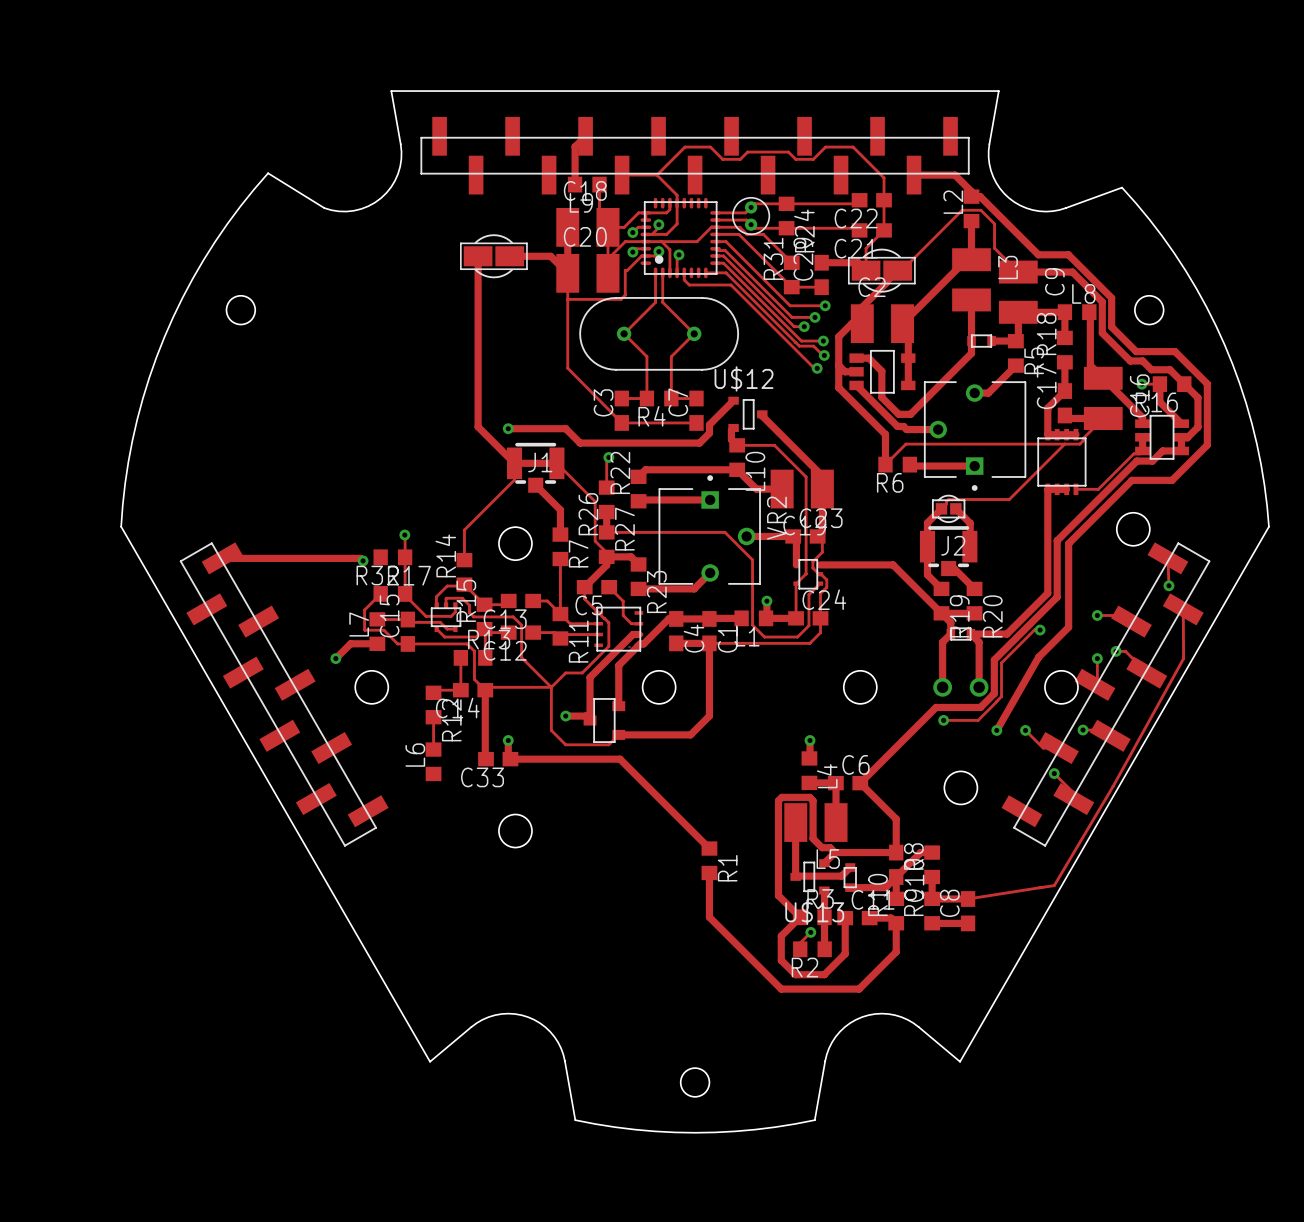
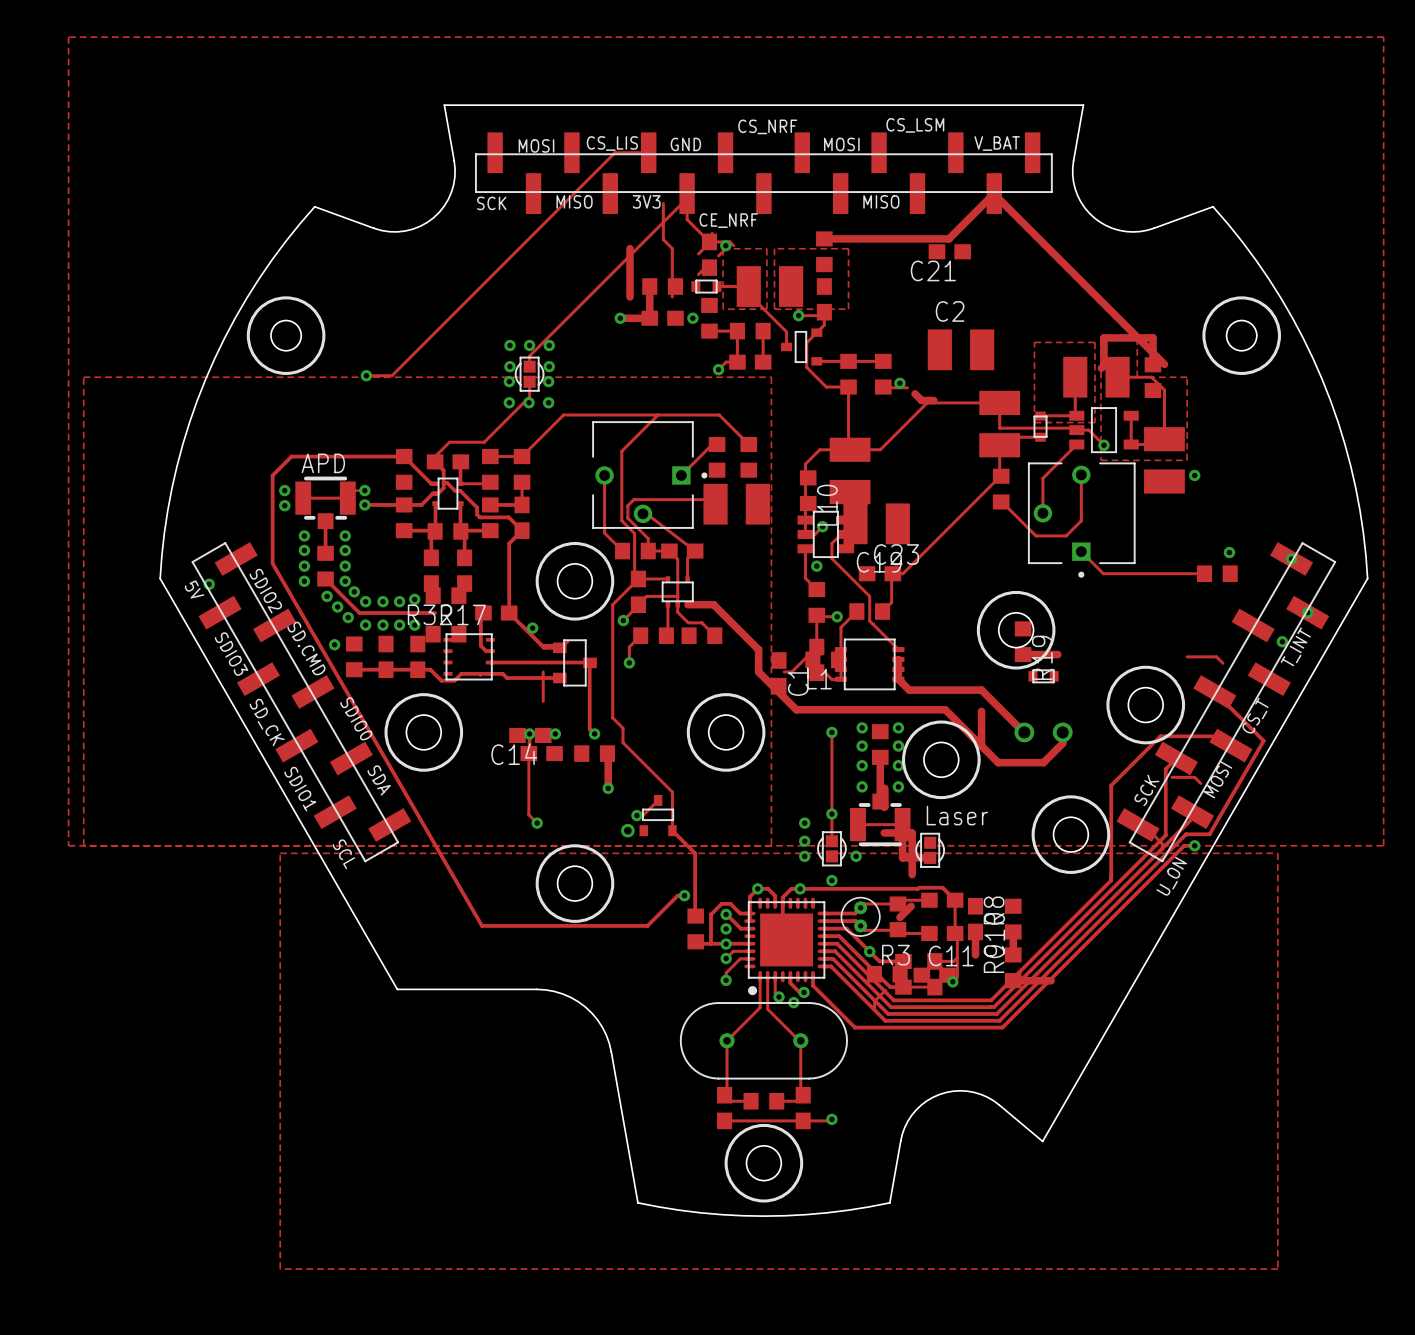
zone outline: none -> (68, 37) (68, 845) (1383, 845) (1383, 37) (68, 37)
text: none -> CS_LSM (915, 125)
text: none -> CS_NRF (767, 126)
text: none -> CS_LIS (612, 143)
text: none -> V_BAT (997, 143)
text: none -> GND (685, 144)
text: none -> MOSI (841, 144)
text: none -> MOSI (536, 145)
track: (585, 136) (575, 146) (575, 184) (576, 182) -> (648, 152) (615, 152) (392, 375) (366, 375)
track: (622, 175) (656, 175) -> (687, 193) (687, 198) (529, 356) (529, 366)
track: (656, 175) (677, 195) (677, 223) (666, 234) (645, 234) -> none
track: (656, 175) (685, 147) (710, 147) (722, 159) (740, 159) (747, 152) (788, 152) (795, 159) (813, 159) (825, 147) (853, 147) (884, 177) (884, 230) (866, 248) (866, 270) (858, 262) (821, 262) -> none
track: (914, 175) (954, 175) (971, 191) (971, 196) (980, 196) (1038, 254) (1068, 254) (1111, 297) (1111, 327) (1136, 351) (1175, 351) (1207, 383) (1207, 445) (1172, 480) (1131, 480) (1068, 543) (1068, 627) (1038, 657) (996, 730) -> none
text: none -> MISO (574, 201)
text: none -> 3V3 (646, 201)
text: none -> MISO (881, 201)
text: none -> SCK (491, 203)
L9: (587, 184) -> none
board edge: (1122, 187) (1149, 219) (1185, 270) (1206, 306) (1224, 344) (1239, 383) (1251, 423) (1261, 464) (1268, 526) (960, 1061) (907, 1019) (888, 1014) (868, 1015) (856, 1019) (844, 1027) (832, 1042) (825, 1061) (814, 1120) (755, 1129) (715, 1132) (654, 1131) (575, 1120) (564, 1061) (558, 1042) (545, 1027) (534, 1019) (521, 1015) (501, 1014) (482, 1019) (430, 1061) (121, 526) (128, 462) (137, 419) (149, 378) (173, 317) (192, 278) (215, 241) (240, 206) (268, 173) (324, 208) -> (1213, 206) (1242, 241) (1268, 278) (1303, 338) (1322, 379) (1338, 422) (1355, 488) (1363, 533) (1367, 578) (1042, 1141) (987, 1097) (967, 1091) (946, 1092) (933, 1097) (921, 1104) (907, 1121) (900, 1140) (889, 1202) (827, 1212) (785, 1215) (721, 1214) (637, 1202) (609, 1043) (597, 1019) (578, 1001) (562, 993) (545, 989) (397, 989) (160, 578) (167, 510) (177, 465) (189, 422) (214, 358) (246, 298) (285, 241) (314, 206) (374, 228)
track: none -> (687, 212) (687, 219) (709, 241) (729, 241) (733, 245)
text: none -> CE_NRF (728, 220)
track: (859, 200) (855, 203) (754, 203) (745, 212) (715, 212) -> none
C22: (871, 200) -> none
track: (669, 203) (669, 209) (666, 212) (638, 212) (624, 227) (607, 227) -> none
L2: (971, 208) -> none
part: (751, 216) -> none
R24: (786, 216) -> none
track: none -> (824, 238) (948, 238) (994, 193) (1164, 364) (1079, 278)
track: (715, 220) (746, 220) (754, 228) (857, 228) (859, 230) -> none
track: (971, 221) (971, 259) (966, 259) (902, 323) (908, 329) (908, 385) -> none
C18: (587, 227) -> none
zone outline: none -> (723, 248) (723, 309) (766, 309) (766, 248) (723, 248)
zone outline: none -> (774, 248) (848, 248) (848, 309) (774, 309) (774, 248)
part: none -> (824, 251)
via: (632, 232) -> none
part: none -> (709, 254)
track: (715, 234) (739, 234) (791, 287) (821, 287) -> none
part: (680, 238) -> none
track: (661, 241) (669, 249) (669, 272) -> none
track: (715, 241) (726, 241) (790, 305) (825, 305) -> none
track: (715, 248) (725, 250) (792, 317) (814, 317) -> none
track: (658, 251) (654, 255) (641, 255) (625, 270) (625, 295) (621, 299) (567, 299) -> none
via: (658, 251) -> none
via: (632, 252) -> none
track: (678, 254) (677, 256) (677, 272) -> none
via: (678, 254) -> none
track: (715, 255) (723, 255) (794, 326) (804, 326) -> none
track: (478, 256) (478, 426) (514, 463) -> none
part: (493, 256) -> none
track: (509, 256) (550, 256) (567, 273) (567, 368) (621, 422) (696, 422) -> none
track: (607, 259) (625, 241) (697, 241) (711, 227) (739, 227) (747, 234) (763, 234) (791, 262) -> none
track: none -> (649, 286) (649, 318) (620, 318)
part: none -> (662, 286)
part: none -> (706, 286)
track: none -> (717, 286) (748, 286) (748, 294) (786, 331) (786, 346)
part: none -> (769, 286)
track: (715, 263) (723, 263) (801, 341) (823, 341) -> none
part: (881, 270) -> none
track: (897, 270) (862, 306) (862, 323) (851, 323) (838, 336) (838, 387) (885, 434) (885, 464) (905, 444) (1079, 444) (1103, 418) (1067, 418) (1064, 415) -> none
track: (896, 271) (901, 271) (962, 210) (980, 210) (994, 223) (994, 248) (1018, 272) (1072, 272) (1102, 301) (1102, 333) (1130, 360) (1142, 360) (1151, 369) (1169, 369) (1197, 397) (1197, 427) (1187, 437) (1181, 437) (1181, 450) (1162, 450) (1152, 461) (1136, 461) (1057, 540) (1057, 597) (994, 659) (994, 693) (980, 707) (936, 707) (860, 783) -> none
drawing: none -> [246, 296, 326, 375]
track: (655, 272) (655, 302) (624, 333) (646, 356) (646, 398) (621, 398) -> none
track: (662, 272) (662, 302) (694, 333) (671, 356) (671, 398) (696, 398) -> none
track: (684, 272) (684, 279) (689, 285) (731, 285) (814, 368) (817, 368) -> none
track: (705, 272) (726, 272) (799, 346) (813, 346) (824, 355) -> none
drawing: none -> [1202, 296, 1281, 375]
C20: (587, 273) -> none
R31: (791, 274) -> none
C29: (821, 274) -> none
part: none -> (824, 299)
L3: (971, 279) -> none
track: none -> (798, 315) (820, 315) (824, 312) (824, 325) (806, 342) (806, 367) (826, 387) (848, 387) (848, 443) (854, 449)
via: none -> (798, 315)
C9: (1018, 292) -> none
via: none -> (620, 318)
part: none -> (662, 318)
via: none -> (692, 318)
part: none -> (709, 318)
track: (971, 299) (971, 353) (910, 414) (898, 414) (881, 397) (881, 371) (868, 358) (856, 358) -> none
track: none -> (709, 331) (737, 331) (737, 362) (726, 362) (718, 369)
part: none -> (750, 331)
track: none -> (763, 331) (763, 362)
via: (825, 305) -> none
L8: (1077, 312) -> none
track: (1089, 312) (1090, 365) (1142, 417) (1142, 423) -> none
zone outline: none -> (1100, 339) (1137, 339) (1137, 377) (1187, 377) (1187, 460) (1100, 460) (1100, 339)
zone outline: none -> (1034, 342) (1034, 422) (1094, 422) (1094, 342) (1034, 342)
via: (814, 317) -> none
via: none -> (509, 345)
via: none -> (529, 345)
via: none -> (549, 345)
part: none -> (801, 346)
via: (804, 326) -> none
part: (659, 333) -> none
track: none -> (816, 361) (883, 361)
R18 name: R18 (1046, 334) -> none
part: none -> (750, 362)
via: none -> (509, 366)
via: none -> (549, 366)
via: (823, 341) -> none
part rotation: 0° (981, 341) -> 90° clockwise (1040, 426)
part position: (981, 341) -> (1040, 426)
track: (991, 341) (1015, 341) -> none
via: none -> (718, 369)
part: none -> (529, 374)
part: none -> (848, 374)
part: none -> (883, 374)
via: none -> (366, 375)
track: none -> (1075, 377) (1076, 415) (1040, 416)
part: none -> (1096, 377)
track: none -> (1117, 377) (1151, 377) (1164, 390) (1164, 439) (1159, 444) (1131, 444) (1131, 415)
via: none -> (509, 381)
track: none -> (529, 381) (529, 396) (484, 442) (449, 442) (435, 456) (435, 461) (443, 470) (443, 488) (438, 493) (432, 493) (421, 504) (364, 504)
via: none -> (548, 381)
R5: (1015, 353) -> none
track: none -> (883, 387) (907, 387)
track: (1064, 362) (1064, 391) (1047, 408) (1047, 434) (1075, 434) -> none
track: (1015, 365) (988, 393) (974, 393) -> none
via: (817, 368) -> none
part position: (882, 371) -> (1103, 430)
via: none -> (509, 402)
via: none -> (529, 402)
via: none -> (548, 402)
track: none -> (999, 402) (999, 428) (1074, 428) (1076, 430) (1088, 430) (1103, 445)
track: none -> (1008, 402) (927, 402) (880, 449) (819, 449) (805, 464) (805, 534) (814, 534) (822, 526)
track: (1141, 384) (1159, 384) (1159, 402) (1181, 423) -> none
via: (1141, 384) -> none
R16: (1172, 384) -> none
track: none -> (658, 415) (621, 451) (621, 520) (634, 533) (634, 575) (638, 579)
track: (856, 385) (897, 426) (903, 426) (906, 429) (938, 429) -> none
part: none -> (999, 424)
R4: (659, 398) -> none
C16: (1103, 398) -> none
track: (733, 400) (709, 424) (709, 433) (699, 443) (580, 443) (565, 428) (508, 428) -> none
C17: (1064, 403) -> none
track: none -> (1043, 437) (1007, 437) (999, 445) (999, 476) (902, 573) (899, 573) (891, 581) (891, 602) (882, 611)
C3: (621, 410) -> none
C7: (696, 410) -> none
track: none -> (717, 444) (712, 444) (681, 475)
track: none -> (748, 444) (719, 415) (563, 415) (522, 456) (490, 456)
track: none -> (1076, 444) (1042, 478) (1042, 513)
U$12: (747, 414) -> none
track: (762, 414) (822, 476) (822, 531) (817, 536) -> none
via: none -> (1103, 445)
part: none -> (717, 457)
part: none -> (748, 457)
track: (733, 427) (731, 430) (731, 439) (737, 445) (774, 445) (806, 476) (806, 573) (796, 583) (796, 618) (766, 618) (766, 601) -> none
via: (508, 428) -> none
part: none -> (1164, 460)
part: none -> (447, 461)
track: none -> (460, 461) (460, 483) (490, 482)
text: none -> APD (323, 463)
part position: (975, 436) -> (1081, 520)
part: none -> (404, 469)
part: none -> (490, 469)
part: none -> (522, 469)
track: (1142, 437) (1142, 450) (1139, 453) (1133, 453) (1098, 489) (1075, 489) -> none
part: (1162, 437) -> none
part: none -> (850, 470)
part: none -> (649, 475)
track: none -> (1081, 474) (1081, 520) (1066, 535) (1035, 535) (1001, 501)
track: none -> (604, 475) (604, 533) (622, 551)
via: none -> (1194, 475)
track: (1064, 444) (1009, 499) (948, 499) (927, 522) (927, 574) (941, 588) -> none
track: none -> (522, 482) (522, 504) (490, 504)
track: none -> (435, 483) (431, 483) (404, 456) (291, 456) (272, 475) (272, 563) (482, 925) (647, 925) (677, 895) (684, 895)
track: none -> (443, 483) (447, 483) (455, 490) (460, 490) (477, 507) (477, 514) (479, 517) (508, 517) (522, 530) (509, 543) (509, 613) (543, 647) (559, 647)
part: none -> (1001, 489)
via: none -> (284, 490)
track: none -> (364, 490) (355, 490) (347, 498) (303, 498)
via: none -> (364, 490)
track: (608, 457) (606, 459) (606, 487) -> none
via: (608, 457) -> none
part: none -> (447, 493)
part rotation: 0° (1061, 462) -> 90° clockwise (869, 664)
part position: (1061, 462) -> (869, 664)
track: (514, 463) (556, 463) (595, 501) (595, 541) (606, 552) (606, 556) -> none
track: (514, 463) (514, 479) (464, 530) (464, 560) -> none
R6: (897, 464) -> none
track: (909, 464) (974, 466) -> none
J1: (535, 467) -> none
part: none -> (325, 502)
track: none -> (435, 503) (435, 531) (431, 535) (431, 557)
track: none -> (460, 503) (460, 531) (464, 535) (464, 557)
track: none -> (715, 504) (710, 499) (633, 499) (627, 505) (627, 518) (648, 538) (648, 551) (669, 551) (677, 559) (677, 612) (688, 622) (701, 622) (714, 635)
part: none -> (736, 504)
via: none -> (284, 505)
via: none -> (364, 504)
track: (638, 476) (645, 469) (737, 469) (756, 489) (782, 489) -> none
track: none -> (642, 513) (646, 513) (695, 551) (687, 558) (687, 579)
part: none -> (404, 517)
part: none -> (490, 517)
part: none -> (522, 517)
track: (535, 485) (560, 509) (560, 534) -> none
track: none -> (846, 520) (846, 534) (840, 534) (831, 543) (831, 558) (869, 596) (869, 620) (898, 649)
track: none -> (325, 521) (325, 553)
R22: (638, 489) -> none
track: (1066, 489) (1047, 489) (1047, 593) (1007, 634) (970, 634) (979, 642) (979, 687) -> (687, 604) (713, 604) (758, 649) (758, 671) (796, 709) (945, 709) (998, 762) (1043, 762) (1062, 743) (1062, 732)
via: none -> (822, 526)
track: none -> (404, 530) (435, 531)
track: none -> (490, 530) (460, 531)
part: none -> (447, 531)
R27: (606, 499) -> none
track: (710, 499) (638, 501) -> none
part: none -> (825, 534)
via: none -> (304, 535)
via: none -> (345, 535)
drawing: none -> [535, 541, 615, 621]
part: (948, 508) -> none
track: (955, 508) (970, 523) (969, 546) -> none
track: (606, 512) (606, 532) (725, 532) (752, 559) (752, 625) (764, 637) -> (816, 672) (825, 672) (831, 679) (836, 679)
track: none -> (805, 548) (805, 578) (816, 589)
round board edge: [1116, 512, 1150, 546] -> none
via: none -> (304, 550)
via: none -> (345, 550)
part: none -> (635, 551)
part: none -> (682, 551)
track: none -> (1081, 551) (1103, 573) (1204, 573)
via: none -> (1229, 552)
via: none -> (1291, 559)
via: none -> (304, 566)
part: none -> (325, 566)
via: none -> (345, 566)
VR2: (709, 529) -> none
via: none -> (816, 566)
track: (822, 529) (822, 552) (812, 561) (812, 568) (826, 579) (826, 587) (820, 593) (820, 632) (809, 643) (709, 643) -> none
part: none -> (431, 570)
part: none -> (464, 570)
track: (404, 535) (405, 595) (426, 616) (451, 616) (455, 612) (455, 605) -> none
via: (404, 535) -> none
track: (746, 536) (793, 536) (796, 539) (796, 564) -> none
part: none -> (1217, 573)
track: none -> (325, 579) (359, 613) (435, 613)
track: none -> (638, 579) (667, 579)
track: none -> (638, 579) (612, 604) (612, 717) (622, 728) (622, 742) (672, 792) (672, 830) (695, 853) (695, 916)
via: none -> (304, 581)
via: none -> (345, 581)
R26: (606, 544) -> none
via: none -> (209, 584)
R7: (560, 546) -> none
text: none -> 5V (194, 589)
J2: (948, 551) -> none
drawing: none -> [976, 590, 1056, 670]
text: none -> SDIO2 (265, 591)
via: none -> (354, 591)
part: none -> (638, 591)
part: none -> (677, 591)
track: (606, 556) (606, 565) (584, 587) (584, 599) (608, 622) (608, 646) (582, 672) (565, 672) (551, 687) -> none
track: (606, 556) (630, 556) (638, 564) -> none
track: (222, 558) (360, 558) (363, 560) -> none
via: none -> (327, 596)
track: none -> (677, 596) (646, 596) (623, 620)
part footprint: [793, 558, 824, 590] -> [849, 603, 891, 620]
track: (1167, 558) (1168, 585) -> none
track: (560, 559) (560, 614) -> none
via: none -> (365, 601)
via: none -> (382, 601)
via: none -> (399, 601)
part: none -> (816, 602)
track: (820, 564) (893, 564) (950, 622) (950, 634) (942, 642) (942, 687) -> (898, 659) (898, 679) (909, 690) (981, 690) (1024, 732)
track: none -> (667, 604) (666, 635) (666, 630)
via: none -> (337, 606)
track: (948, 568) (954, 568) (974, 588) -> none
R14: (464, 572) -> none
track: (710, 572) (694, 588) (638, 588) -> none
track: none -> (483, 613) (480, 615) (480, 645) (486, 651) (490, 651)
part: none -> (496, 613)
round board edge: none -> [998, 612, 1034, 648]
via: none -> (1307, 612)
R23: (638, 576) -> none
track: none -> (837, 616) (816, 615) (816, 647) (791, 671) (784, 671)
via: none -> (348, 617)
via: none -> (623, 620)
track: (820, 583) (808, 594) (808, 625) (797, 637) (768, 637) -> (856, 611) (840, 627) (840, 679)
via: none -> (365, 625)
via: none -> (382, 625)
via: none -> (399, 625)
via: none -> (414, 625)
via: (1168, 585) -> none
track: (465, 586) (447, 586) (436, 596) (436, 605) -> none
C5: (596, 587) -> none
track: (609, 587) (623, 601) (623, 615) (631, 623) (638, 623) -> none
via: none -> (532, 628)
track: (380, 593) (364, 610) (364, 630) (383, 630) (397, 643) (467, 643) (474, 651) (474, 679) (485, 690) -> none
track: none -> (640, 635) (629, 647) (629, 662)
part: none -> (653, 635)
part: none -> (701, 635)
C13: (520, 600) -> none
track: (533, 600) (547, 600) (570, 623) (598, 623) -> none
via position: (766, 601) -> (837, 616)
R20: (974, 601) -> none
via: none -> (1282, 641)
via: none -> (334, 644)
track: (446, 605) (446, 598) (462, 598) (469, 605) (469, 612) (473, 616) (513, 616) (521, 625) (521, 657) (551, 687) -> none
text: none -> T_INT (1295, 646)
text: none -> SD.СMD (306, 648)
track: (1183, 609) (1183, 658) (1113, 786) (1054, 885) (1039, 887) -> none
text: none -> SDIO3 (231, 654)
part: none -> (354, 656)
part: none -> (386, 656)
part: none -> (417, 656)
via: (1097, 615) -> none
R15: (484, 616) -> none
part: (446, 617) -> none
track: (741, 618) (668, 618) (618, 665) (618, 706) -> none
part: none -> (816, 659)
C24: (808, 618) -> none
track: (377, 619) (440, 622) (447, 629) (455, 629) -> none
track: none -> (490, 662) (589, 662)
track: none -> (589, 662) (589, 729) (594, 733)
via: none -> (629, 662)
drawing: none -> [1106, 665, 1186, 745]
R11: (560, 626) -> none
track: none -> (354, 669) (430, 669) (441, 680) (454, 680) (461, 673) (502, 673) (506, 678) (559, 678)
track: (436, 629) (444, 637) (476, 637) (484, 629) (488, 632) (508, 632) -> none
part position: (618, 629) -> (469, 656)
track: (1039, 629) (1034, 629) (1001, 662) (1001, 696) (978, 720) (943, 720) -> none
via: (1040, 630) -> none
L7: (377, 631) -> none
C15: (407, 631) -> none
C4: (676, 631) -> none
C12: (520, 632) -> none
track: (533, 632) (554, 632) (560, 638) (564, 634) (598, 634) -> none
track: (638, 634) (632, 634) (590, 677) (590, 720) (585, 716) (565, 716) -> none
track: (377, 643) (350, 643) (335, 658) -> none
track: (676, 643) (709, 643) -> none
track: (709, 643) (709, 716) (690, 734) (618, 734) (608, 744) (565, 744) (551, 730) (551, 687) -> none
track: none -> (1214, 692) (1263, 740) (1209, 834) (1186, 834) (999, 1020) (885, 1020) (831, 966) (823, 966)
drawing: none -> [384, 693, 464, 772]
drawing: none -> [686, 693, 766, 772]
via: (1116, 651) -> none
track: (460, 657) (460, 690) (436, 690) (433, 692) -> none
R13: (473, 657) -> none
via: (335, 658) -> none
track: (1097, 658) (1097, 682) (1094, 684) -> none
via: (1097, 658) -> none
track: none -> (981, 711) (981, 746)
text: none -> CS_T (1255, 715)
text: none -> SDIO0 (356, 718)
drawing: none -> [902, 720, 981, 800]
text: none -> SD_CK (267, 722)
via: none -> (862, 727)
via: none -> (898, 727)
track: (551, 687) (488, 687) (485, 690) -> none
track: none -> (831, 732) (831, 841) (835, 842)
via: none -> (831, 732)
round board edge position: (860, 687) -> (941, 759)
round board edge position: (1061, 687) -> (1145, 705)
track: none -> (529, 733) (528, 814) (537, 823)
via: none -> (529, 733)
via: none -> (555, 733)
via: none -> (594, 733)
track: (485, 690) (486, 759) -> none
part position: (284, 694) -> (301, 702)
part position: (1105, 694) -> (1226, 702)
part: none -> (880, 744)
track: none -> (1230, 745) (1221, 736) (1160, 736) (1111, 785) (1111, 880) (991, 1000) (893, 1000) (837, 943) (823, 943)
via: none -> (862, 746)
via: none -> (898, 746)
R12: (433, 705) -> none
part: none -> (541, 753)
part: none -> (594, 753)
track: none -> (607, 753) (608, 788)
track: none -> (880, 757) (880, 801)
track: none -> (1176, 758) (1165, 769) (1165, 835) (994, 1007) (890, 1007) (835, 951) (823, 951)
via: (565, 716) -> none
track: (433, 717) (433, 749) -> none
via: none -> (862, 765)
via: none -> (898, 765)
part rotation: 0° (604, 720) -> 180° (574, 662)
part position: (604, 720) -> (574, 662)
via: (943, 720) -> none
via: (996, 730) -> none
track: (1025, 730) (1043, 748) (1058, 748) -> none
via: (1025, 730) -> none
via: (1083, 730) -> none
text: none -> SDA (379, 780)
text: none -> MOSI (1217, 779)
via: none -> (862, 786)
via: none -> (898, 786)
track: (508, 740) (508, 757) (510, 759) (620, 759) (709, 848) -> none
via: (508, 740) -> none
via: none -> (608, 788)
via: (810, 740) -> none
text: none -> SDIO1 (300, 789)
text: none -> SCK (1146, 790)
drawing: none -> [1031, 795, 1111, 874]
track: none -> (658, 800) (642, 815) (636, 815)
C33: (498, 759) -> none
L6: (433, 761) -> none
track: none -> (1192, 812) (1192, 818) (996, 1013) (888, 1013) (833, 958) (823, 958)
via: none -> (831, 814)
via: none -> (636, 815)
part: none -> (658, 815)
text: none -> Laser (957, 815)
part: none -> (880, 819)
L4: (809, 770) -> none
via: none -> (537, 823)
via: none -> (804, 823)
via: (1054, 773) -> none
track: none -> (857, 824) (902, 824) (902, 857) (930, 857)
via: none -> (627, 830)
C6: (848, 783) -> none
track: (860, 783) (896, 819) (896, 852) (835, 852) (830, 847) (822, 847) (813, 838) (813, 800) (809, 797) (781, 797) (778, 800) (778, 895) (800, 917) (781, 936) (781, 960) (795, 974) (824, 974) (845, 953) (845, 918) -> none
round board edge position: (960, 787) -> (1070, 834)
via: none -> (804, 841)
drawing: none -> [535, 844, 615, 923]
zone outline: none -> (83, 845) (83, 377) (771, 377) (771, 845)
track: none -> (1194, 845) (1184, 845) (1002, 1027) (854, 1027) (813, 985) (813, 976)
via: none -> (1194, 845)
part: none -> (831, 848)
part: none -> (930, 850)
zone outline: none -> (280, 853) (1277, 853) (1277, 1269) (280, 1269) (280, 853)
text: none -> SCL (343, 854)
via: none -> (804, 856)
via: none -> (856, 856)
track: (795, 822) (795, 876) -> none
L5: (815, 822) -> none
text: none -> U_ON (1171, 876)
via: none -> (831, 880)
via: none -> (757, 888)
via: none -> (800, 888)
via: none -> (684, 895)
track: none -> (929, 900) (901, 900) (897, 903) (864, 903) (854, 913) (823, 913)
part: none -> (942, 900)
track: none -> (955, 900) (957, 977) (952, 981)
track: none -> (955, 900) (942, 887) (791, 888) (782, 897) (782, 936)
track: none -> (775, 903) (775, 895) (768, 888) (757, 888) (749, 896) (749, 921)
track: (932, 852) (920, 852) (885, 887) (850, 887) -> none
track: none -> (749, 913) (740, 913) (730, 903) (721, 903) (710, 914) (710, 943)
track: none -> (726, 914) (740, 928) (749, 928)
via: none -> (726, 914)
R1: (709, 860) -> none
part: none -> (860, 916)
part: none -> (897, 916)
track: none -> (823, 921) (855, 921) (865, 930) (898, 930)
track: (850, 867) (841, 876) (795, 876) -> none
track: (709, 872) (709, 917) (781, 989) (859, 989) (896, 952) (896, 923) (891, 918) (869, 918) -> none
track: none -> (823, 928) (846, 928) (879, 961) (903, 961)
part: none -> (695, 928)
via: none -> (726, 928)
track: none -> (897, 929) (901, 933) (929, 933)
U$13: (810, 876) -> none
part: (850, 877) -> none
part: none -> (942, 933)
track: none -> (823, 936) (839, 936) (890, 987) (934, 987)
track: (1042, 887) (968, 898) (932, 898) -> none
track: none -> (697, 944) (695, 941) (697, 943) (749, 943) (749, 944)
via: none -> (726, 944)
part: none -> (786, 946)
track: (824, 890) (824, 949) -> none
track: none -> (749, 951) (733, 951) (726, 958)
via: none -> (869, 951)
track: none -> (957, 957) (953, 961) (934, 961)
via: none -> (726, 958)
track: none -> (749, 959) (740, 958) (726, 973) (726, 980)
R10: (896, 911) -> none
C8: (968, 911) -> none
part: none -> (903, 974)
part: none -> (934, 974)
track: none -> (760, 976) (760, 1007) (727, 1040) (727, 1092) (724, 1095) (730, 1101) (751, 1101)
track: none -> (767, 976) (767, 1009) (800, 1042)
track: none -> (775, 976) (775, 993) (779, 996)
track: none -> (790, 976) (790, 983) (799, 992) (804, 992)
via: none -> (726, 980)
via: none -> (952, 981)
via: (810, 932) -> none
via: none -> (804, 992)
via: none -> (779, 996)
via: none -> (793, 1002)
R2: (812, 949) -> none
part: none -> (763, 1040)
track: none -> (800, 1040) (800, 1092) (803, 1095) (797, 1101) (776, 1101)
part: none -> (763, 1101)
part: none -> (724, 1108)
part: none -> (803, 1108)
track: none -> (831, 1119) (724, 1120)
via: none -> (831, 1119)
drawing: none -> [724, 1123, 804, 1203]
round board edge position: (695, 1082) -> (763, 1163)

